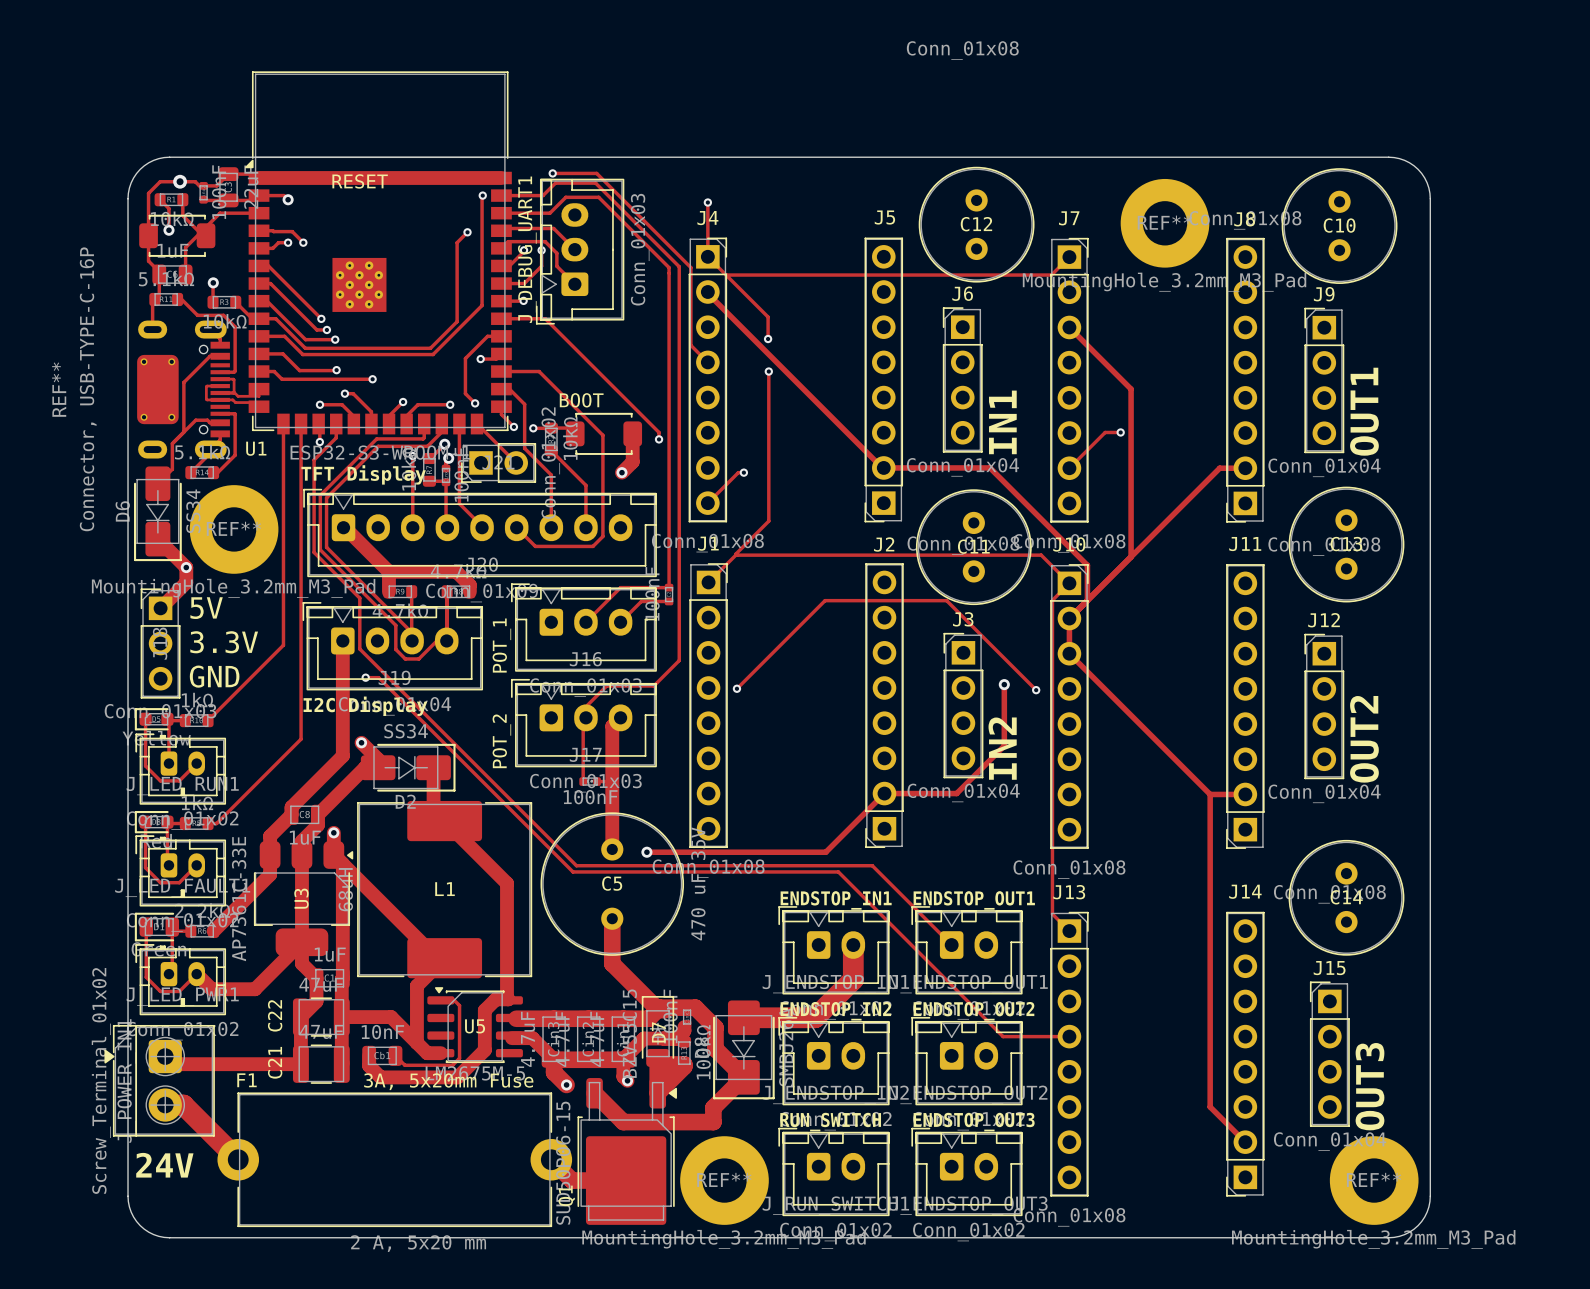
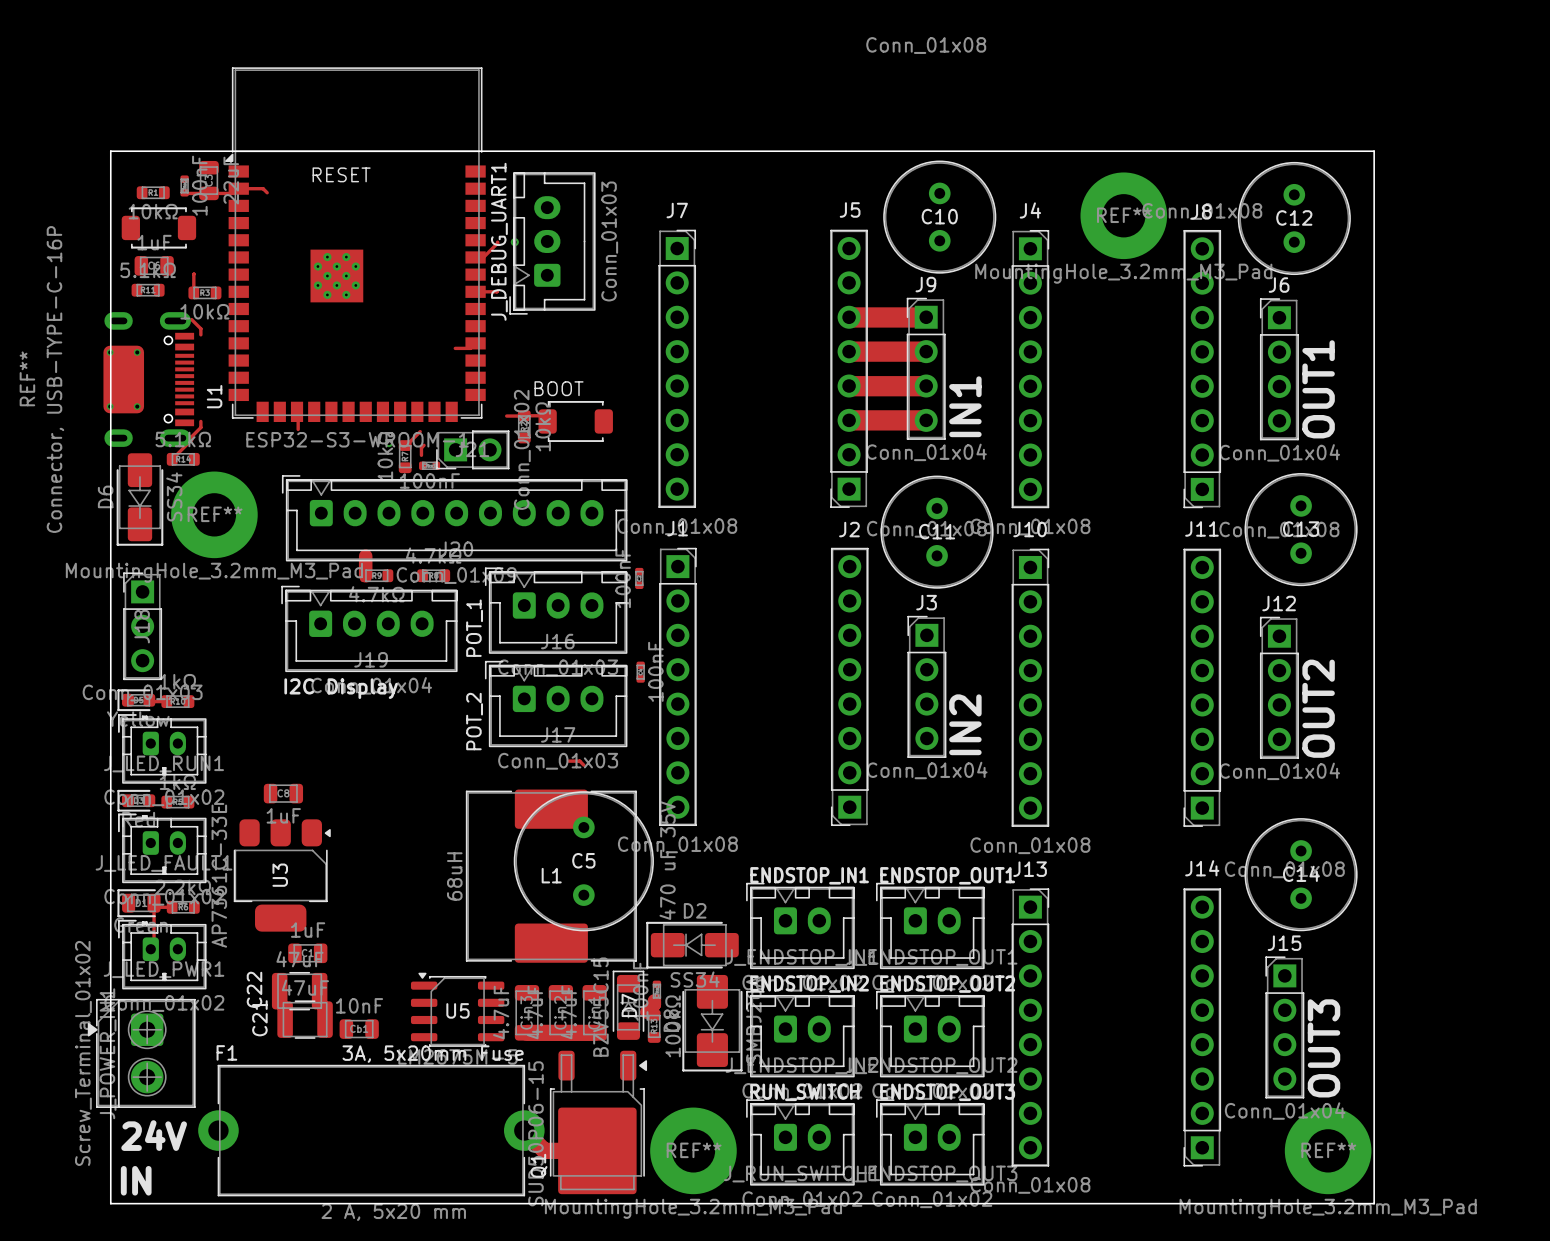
board edge: (169, 157) (153, 160) (140, 169) (131, 182) (128, 198) -> (151, 151) (110, 151) (110, 191)
board edge: (1388, 157) (1404, 160) (1418, 169) (1427, 182) (1430, 198) (1430, 1196) (1427, 1212) (1414, 1229) (1399, 1236) (1388, 1237) (169, 1237) (153, 1234) (140, 1225) (131, 1212) (128, 1196) -> (1342, 151) (1374, 151) (1374, 1203) (110, 1203) (110, 1166)
track: (552, 173) (596, 173) (690, 267) (690, 345) (707, 362) -> none
via: (552, 173) -> none
track: (501, 178) (259, 178) (255, 174) (228, 174) (216, 185) (199, 185) (195, 181) (160, 181) (148, 193) (148, 261) (159, 271) (159, 295) (152, 301) (152, 329) -> none
via: (180, 181) -> none
track: (482, 195) (482, 305) (433, 354) (302, 354) (284, 336) (259, 336) -> none
via: (482, 195) -> none
track: (501, 195) (543, 195) (555, 183) (595, 183) (679, 266) (679, 660) (653, 685) (606, 685) (585, 706) (585, 717) (583, 720) (583, 781) -> none
track: (160, 199) (168, 208) (168, 230) -> none
track: (182, 199) (182, 215) (200, 232) -> none
via: (288, 199) -> none
track: (707, 202) (707, 256) (768, 317) (768, 339) -> none
via: (707, 202) -> none
track: (259, 213) (220, 213) (185, 247) (185, 271) -> none
track: (501, 213) (549, 213) (565, 197) (598, 197) (669, 267) (669, 587) (620, 587) (585, 622) -> none
J4 name: J4 (707, 218) -> J7 (677, 210)
J7 name: J7 (1069, 218) -> J4 (1030, 210)
C12 name: C12 (976, 224) -> C10 (939, 216)
C10 name: C10 (1339, 225) -> C12 (1294, 217)
via: (168, 230) -> none
track: (259, 230) (292, 231) (303, 242) -> none
track: (501, 230) (503, 228) (553, 228) (574, 249) -> none
track: (467, 232) (457, 242) (457, 321) (430, 348) (305, 348) (275, 318) (252, 318) (235, 302) -> none
via: (467, 232) -> none
track: (288, 242) (278, 242) (272, 248) (259, 248) -> none
via: (288, 242) -> none
via: (303, 242) -> none
track: (501, 248) (508, 241) (545, 241) (556, 253) (556, 266) (574, 284) -> none
via: (524, 250) -> none
track: (541, 250) (541, 266) (524, 283) (501, 283) -> none
track: (1069, 257) (1051, 275) (726, 275) -> none
track: (259, 265) (268, 265) (321, 318) -> none
via: (213, 282) -> none
track: (259, 283) (270, 283) (316, 329) (326, 329) -> none
track: (707, 292) (882, 467) (990, 467) (1087, 565) (1087, 600) -> none
J6 name: J6 (962, 293) -> J9 (925, 284)
J9 name: J9 (1324, 294) -> J6 (1279, 285)
track: (177, 295) (197, 315) (223, 315) (235, 326) (235, 371) (220, 372) -> none
via: (523, 300) -> none
track: (259, 301) (267, 301) (305, 339) (335, 339) -> none
via: (321, 318) -> none
track: (501, 318) (545, 318) (659, 432) (659, 439) -> none
track: none -> (849, 317) (926, 317)
track: (1069, 327) (1131, 389) (1131, 556) -> none
via: (326, 329) -> none
track: (501, 336) (487, 336) (465, 358) (465, 393) (475, 403) -> none
via: (335, 339) -> none
via: (768, 339) -> none
track: (259, 353) (282, 353) (299, 370) (336, 370) -> none
track: (220, 356) (210, 356) (183, 382) (183, 432) -> none
via: (480, 359) -> none
track: none -> (849, 351) (926, 351)
via: (336, 370) -> none
track: (259, 371) (274, 371) (281, 379) (372, 379) -> none
track: (501, 371) (539, 371) (602, 435) (602, 536) (592, 546) (535, 546) (516, 527) -> none
track: (768, 371) (768, 521) (735, 555) -> none
via: (768, 371) -> none
track: (220, 379) (234, 379) (233, 393) -> none
via: (372, 379) -> none
track: (220, 386) (207, 386) (206, 399) (259, 402) (259, 406) -> none
part position: (183, 389) -> (148, 379)
track: (259, 389) (259, 396) (238, 396) (234, 393) (220, 393) -> none
track: (501, 389) (509, 389) (524, 404) (524, 448) (551, 475) (551, 527) -> none
track: (344, 393) (353, 393) (371, 411) (371, 424) -> none
via: (344, 393) -> none
track: none -> (849, 386) (926, 386)
track: (403, 402) (389, 416) (389, 424) -> none
via: (403, 402) -> none
via: (475, 403) -> none
track: (319, 404) (342, 404) (353, 416) (353, 424) -> none
via: (319, 404) -> none
track: (450, 404) (417, 404) (406, 415) (406, 424) -> none
via: (450, 404) -> none
track: (501, 406) (501, 414) (513, 426) -> none
track: (220, 413) (235, 414) (235, 455) (217, 472) (213, 472) -> none
track: (220, 422) (195, 420) (172, 443) (172, 469) (157, 483) -> none
track: (282, 424) (283, 645) (208, 720) (203, 715) -> none
track: (301, 424) (301, 739) (216, 823) (208, 823) -> none
track: (336, 424) (336, 437) (314, 460) (314, 552) (359, 598) (359, 649) (576, 865) (872, 865) (951, 945) -> none
track: (424, 424) (423, 438) (376, 438) (320, 495) (320, 549) (395, 625) (395, 649) (405, 658) (418, 658) (447, 630) -> none
track: (441, 424) (441, 432) (427, 446) (378, 446) (326, 497) (326, 547) (412, 632) (412, 640) (411, 640) (411, 591) -> none
track: (459, 424) (459, 503) (482, 526) -> none
track: (477, 424) (516, 462) -> none
via: (513, 426) -> none
via: (533, 428) -> none
track: none -> (849, 420) (926, 420)
track: (1120, 432) (1105, 432) (1069, 468) -> none
via: (1120, 432) -> none
track: (632, 433) (632, 461) (621, 472) -> none
via: (659, 439) -> none
via: (319, 442) -> none
via: (444, 444) -> none
U1 name rotation: 0° (256, 448) -> 90° counterclockwise (214, 396)
U1 name position: U1 (256, 448) -> U1 (214, 396)
track: (551, 450) (585, 485) (585, 527) -> none
track: (412, 456) (412, 527) -> none
via: (448, 458) -> none
track: (1245, 468) (1219, 468) (1069, 618) (1069, 653) (1210, 794) -> none
via: (621, 472) -> none
track: (743, 472) (738, 472) (707, 503) -> none
via: (743, 472) -> none
text: TFT Display (363, 474) -> none
part rotation: 0° (446, 475) -> 90° clockwise (429, 465)
track: (429, 481) (446, 482) (447, 527) -> none
track: (343, 526) (388, 571) (456, 571) (469, 585) (469, 591) -> none
track: (157, 539) (186, 567) (186, 582) (160, 608) -> none
track: (735, 555) (1041, 555) (1069, 583) (1052, 600) (1052, 914) (1069, 931) -> none
track: (735, 555) (708, 582) -> none
via: (186, 567) -> none
track: (447, 591) (446, 640) -> none
track: (669, 601) (641, 601) (620, 622) -> none
text: 5V (206, 608) -> none
track: (342, 640) (342, 755) (291, 807) (291, 814) (270, 836) (270, 874) (213, 931) -> none
text: 3.3V (224, 642) -> none
text: GND (214, 676) -> none
track: (365, 677) (378, 677) (573, 871) (838, 871) (1003, 1036) (1069, 1036) -> none
via: (365, 677) -> none
track: (1004, 684) (1004, 745) (956, 793) (884, 793) (825, 852) (646, 852) -> none
via: (1004, 684) -> none
track: (736, 688) (825, 600) (946, 600) (1036, 690) -> none
via: (736, 688) -> none
via: (1036, 690) -> none
track: (620, 717) (612, 726) (612, 849) -> none
track: (145, 719) (145, 766) (160, 780) (179, 780) (196, 763) -> none
track: (167, 719) (168, 763) -> none
track: (361, 742) (378, 759) (378, 767) (365, 767) (317, 814) (317, 825) (301, 841) (301, 963) (316, 978) (316, 1001) (300, 1017) (300, 1064) (172, 1064) (165, 1056) -> none
via: (361, 742) -> none
D2 rotation: 0° (408, 767) -> 180° (692, 945)
D2 position: (408, 767) -> (692, 945)
track: (433, 767) (433, 809) (506, 883) (508, 999) (495, 999) (484, 1010) (484, 1050) (457, 1077) (380, 1077) (369, 1065) (369, 1055) -> none
part rotation: 0° (590, 781) -> 90° clockwise (640, 672)
part position: (590, 781) -> (640, 672)
track: (1210, 794) (1245, 794) -> none
track: (1210, 794) (1210, 1106) (1245, 1142) -> none
track: (145, 822) (145, 867) (160, 882) (179, 882) (196, 865) -> none
track: (185, 823) (167, 822) (168, 865) -> none
track: (333, 832) (333, 855) (437, 958) (444, 958) (416, 985) (416, 1042) -> none
via: (333, 832) -> none
via: (646, 852) -> none
track: (342, 864) (342, 1063) -> none
L1 position: (444, 889) -> (551, 876)
track: (612, 918) (612, 963) (657, 1009) -> none
track: (146, 927) (146, 977) (160, 991) (179, 991) (196, 974) (211, 989) (255, 989) (301, 942) -> none
track: (853, 945) (853, 979) (815, 1017) (743, 1017) -> none
track: (440, 1000) (454, 1000) (459, 1005) (459, 1058) (452, 1065) (404, 1065) (395, 1055) -> none
track: (341, 1017) (391, 1017) (427, 1053) (440, 1053) -> none
track: (516, 1018) (648, 1018) (659, 1007) (695, 1007) (715, 1027) (715, 1048) (743, 1077) (713, 1107) (713, 1122) (623, 1122) (594, 1093) -> none
U5 position: (475, 1025) -> (457, 1009)
track: (511, 1038) (532, 1038) (554, 1059) (554, 1072) (566, 1084) -> none
track: (684, 1041) (681, 1038) (643, 1038) (623, 1059) (623, 1076) (627, 1080) -> none
track: (657, 1057) (657, 1058) (657, 1093) (684, 1066) (684, 1064) (664, 1064) (657, 1057) -> none
C21 position: (321, 1064) -> (305, 1019)
via: (627, 1080) -> none
via: (566, 1084) -> none
track: (165, 1105) (183, 1105) (238, 1159) -> none
text: none -> IN (136, 1180)

